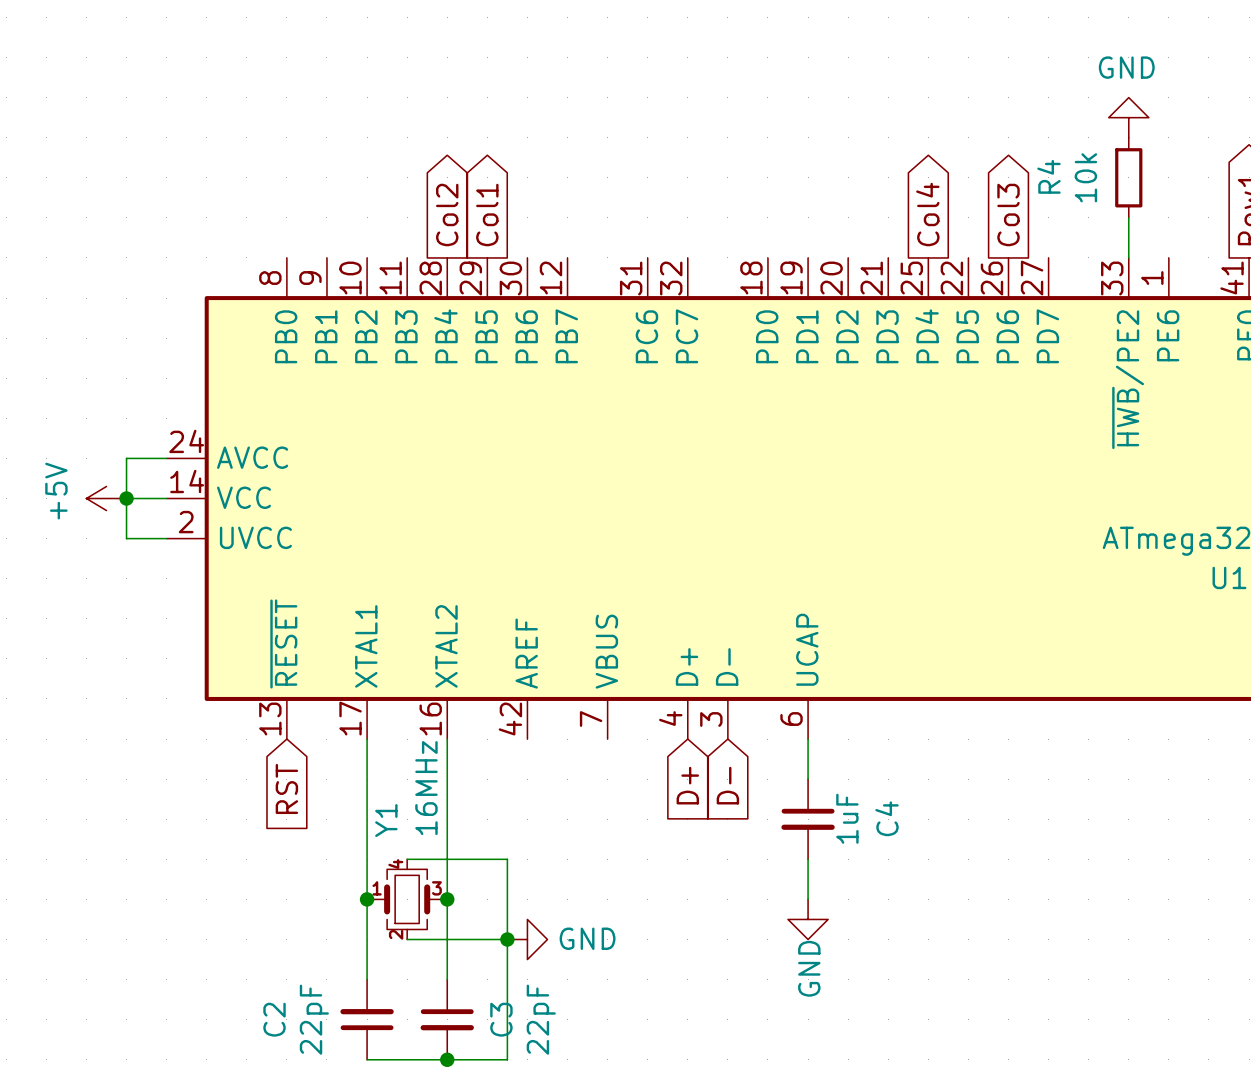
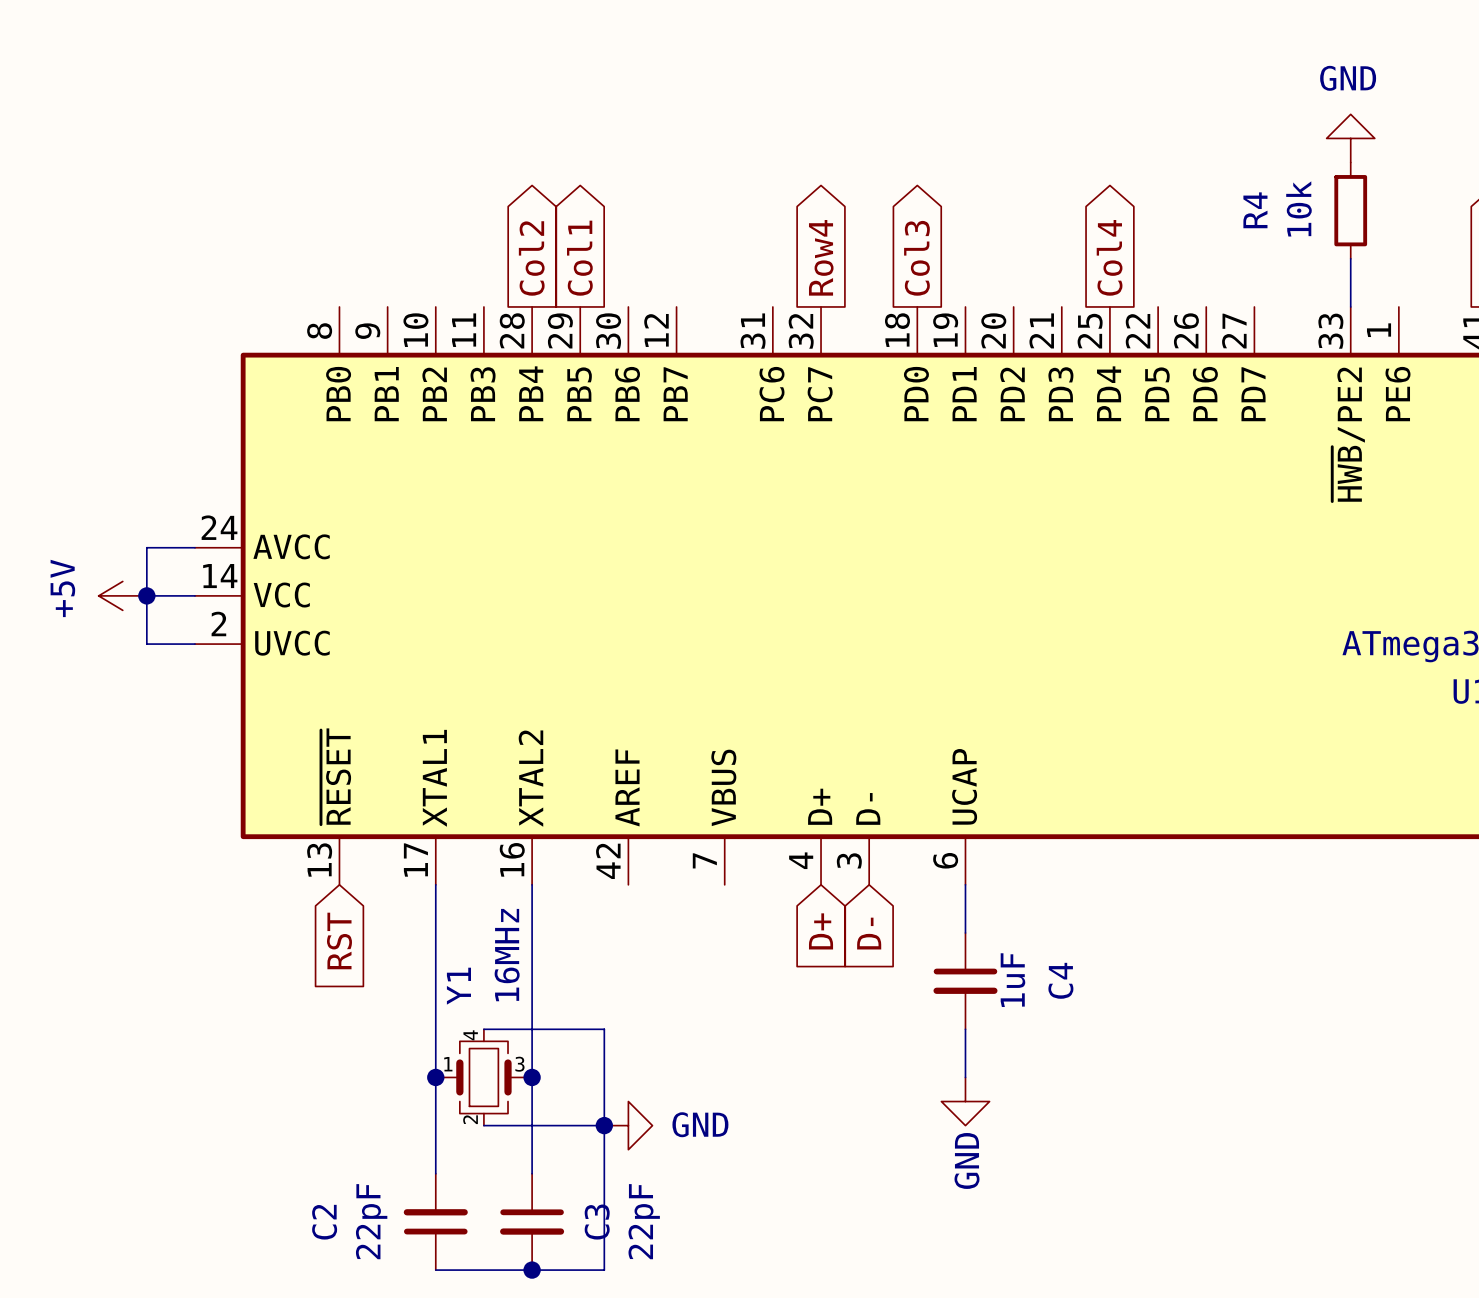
global label: none -> Row4 (821, 257)
global label position: Col3 (1008, 214) -> Col3 (916, 258)

